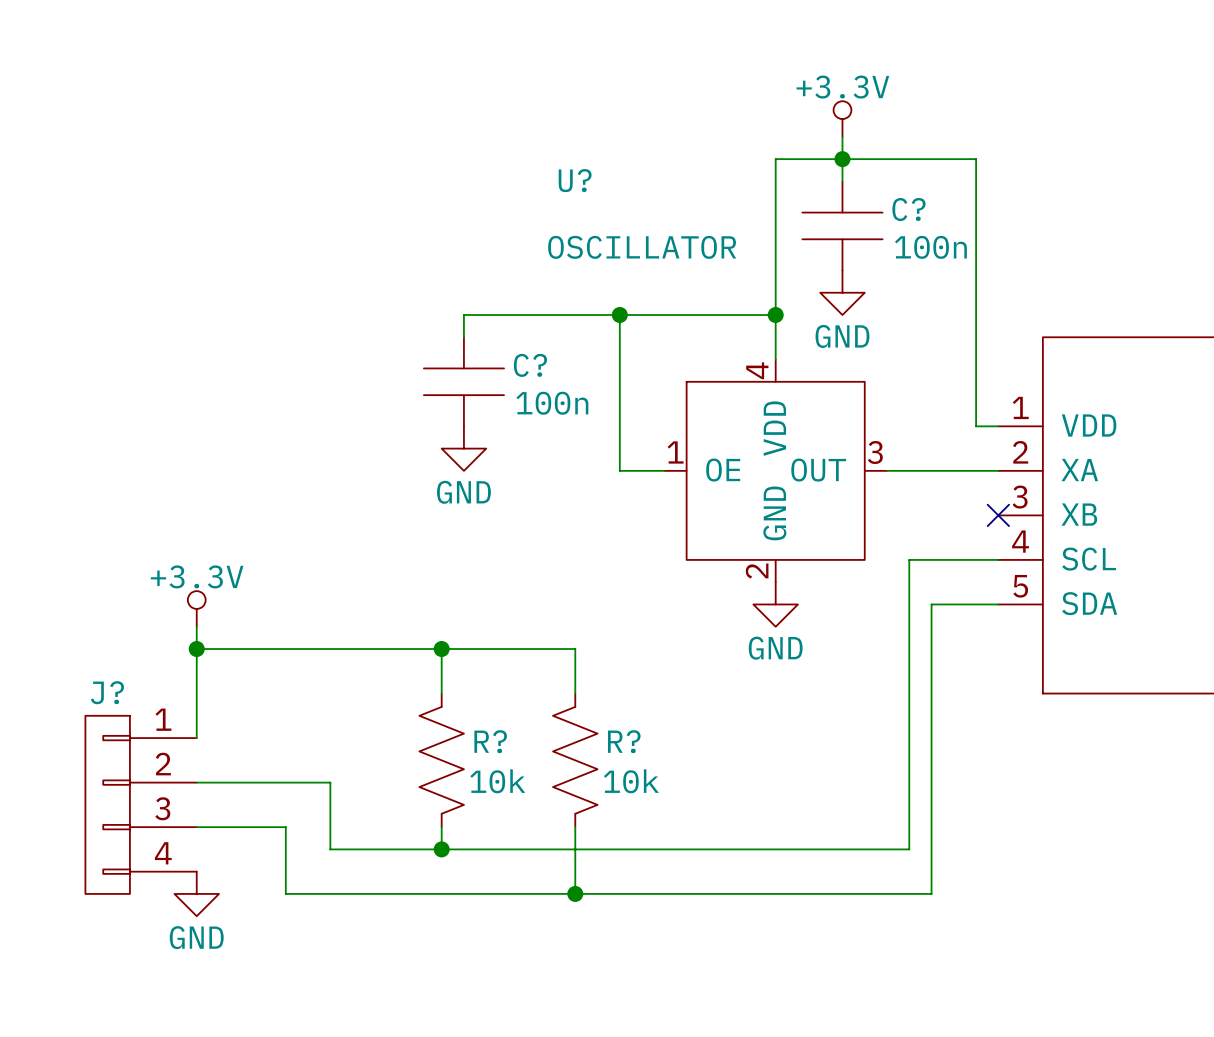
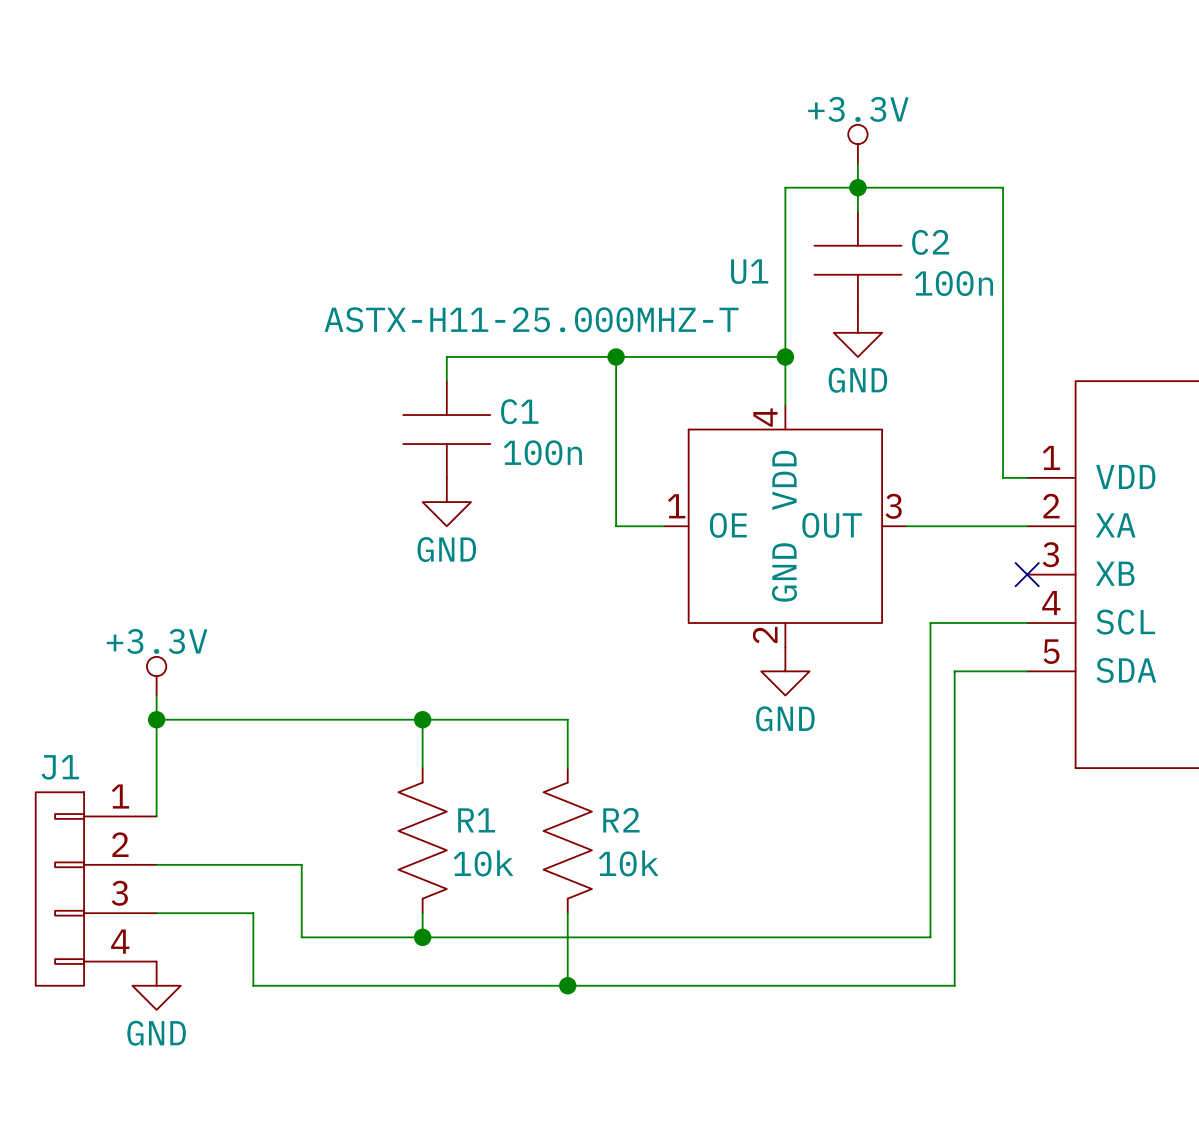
U? name: U? (575, 180) -> U1 (749, 271)
C? name: C? (908, 209) -> C2 (930, 242)
U? value: OSCILLATOR (642, 247) -> ASTX-H11-25.000MHZ-T (531, 319)
C? name: C? (530, 365) -> C1 (519, 411)
J? name: J? (107, 692) -> J1 (60, 767)
R? name: R? (490, 741) -> R1 (476, 820)
R? name: R? (624, 741) -> R2 (621, 820)

